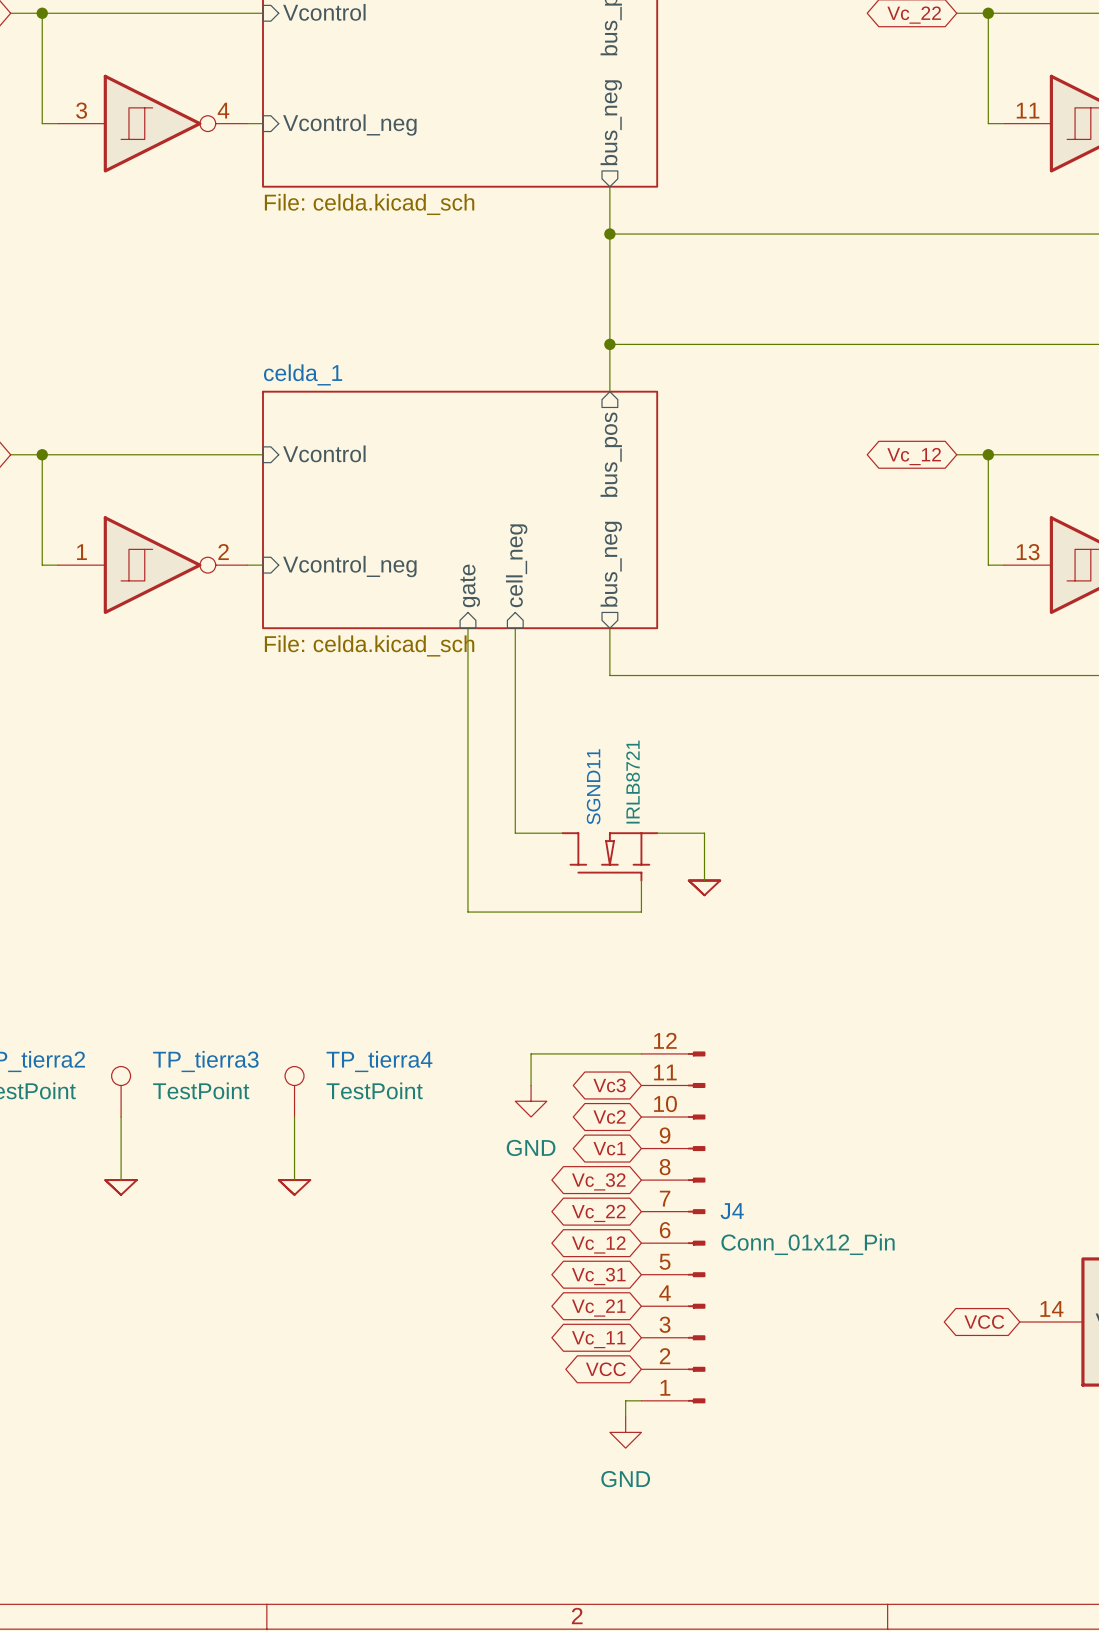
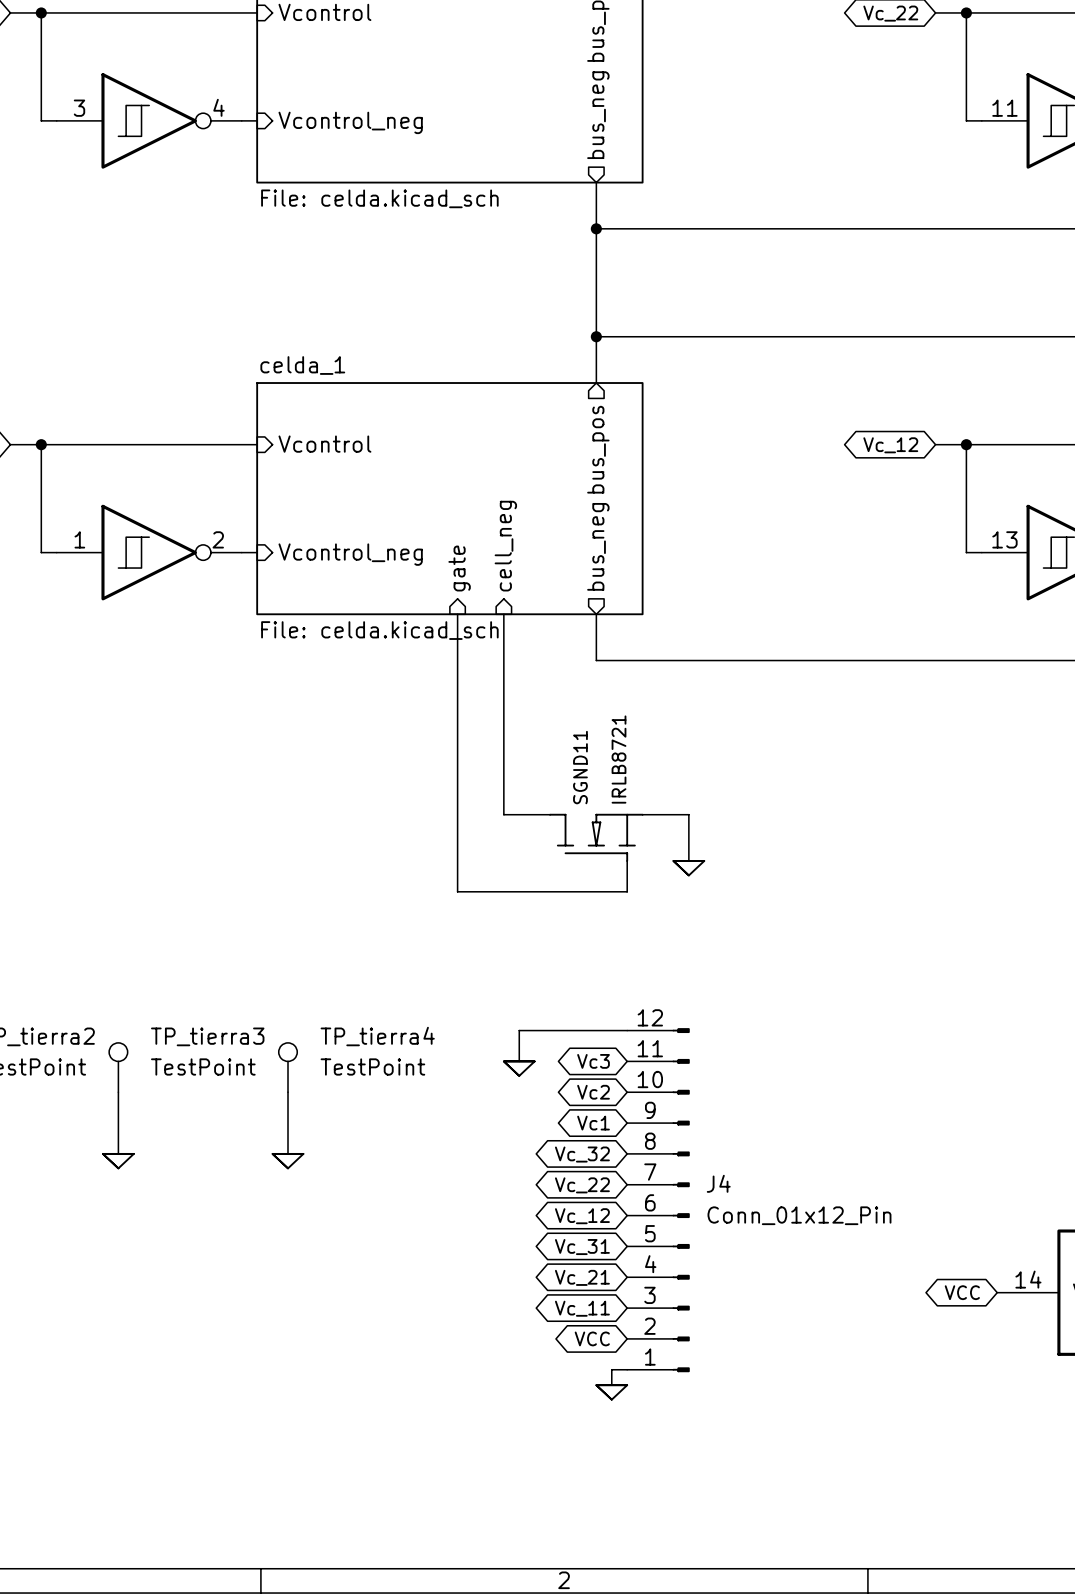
power symbol shape: [515, 1085, 547, 1118] -> [502, 1060, 536, 1077]
power symbol text: GND (531, 1147) -> none
power symbol shape: [609, 1416, 642, 1449] -> [595, 1384, 629, 1401]
power symbol text: GND (625, 1479) -> none

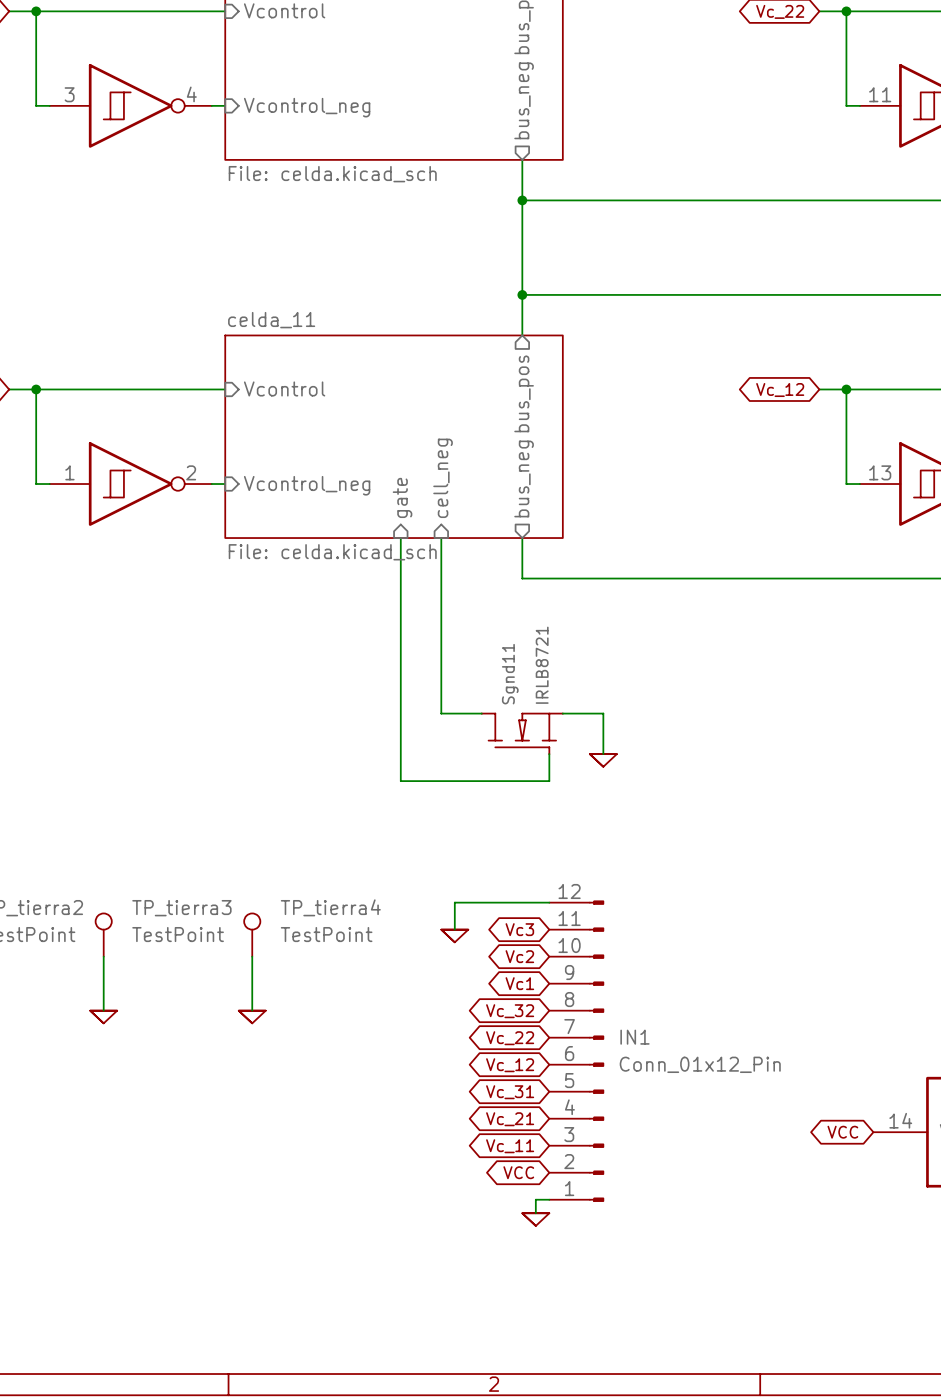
sheet celda_1 name: celda_1 (302, 365) -> celda_11 (271, 320)
SGND11 name: SGND11 (580, 767) -> Sgnd11 (510, 674)
J4 name: J4 (718, 1183) -> IN1 (634, 1037)

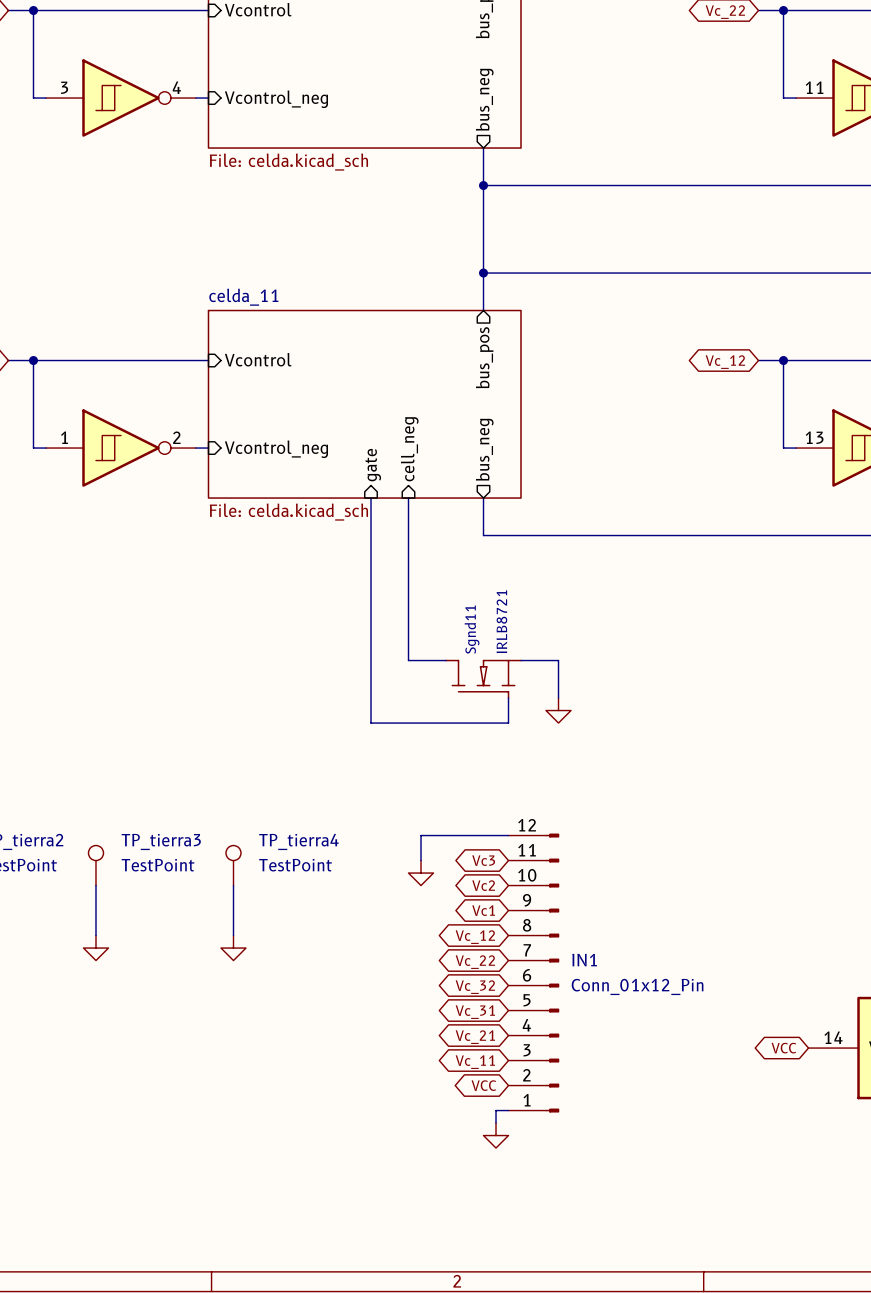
power symbol shape: [589, 753, 618, 768] -> [546, 698, 572, 724]
power symbol shape: [440, 928, 470, 944] -> [408, 860, 434, 886]
power symbol shape: [89, 1009, 119, 1025] -> [83, 935, 109, 961]
power symbol shape: [237, 1009, 267, 1025] -> [220, 935, 247, 961]
global label: Vc_32 (510, 1011) -> Vc_12 (475, 937)
global label: Vc_12 (510, 1065) -> Vc_32 (475, 987)
power symbol shape: [521, 1212, 551, 1227] -> [483, 1123, 509, 1149]

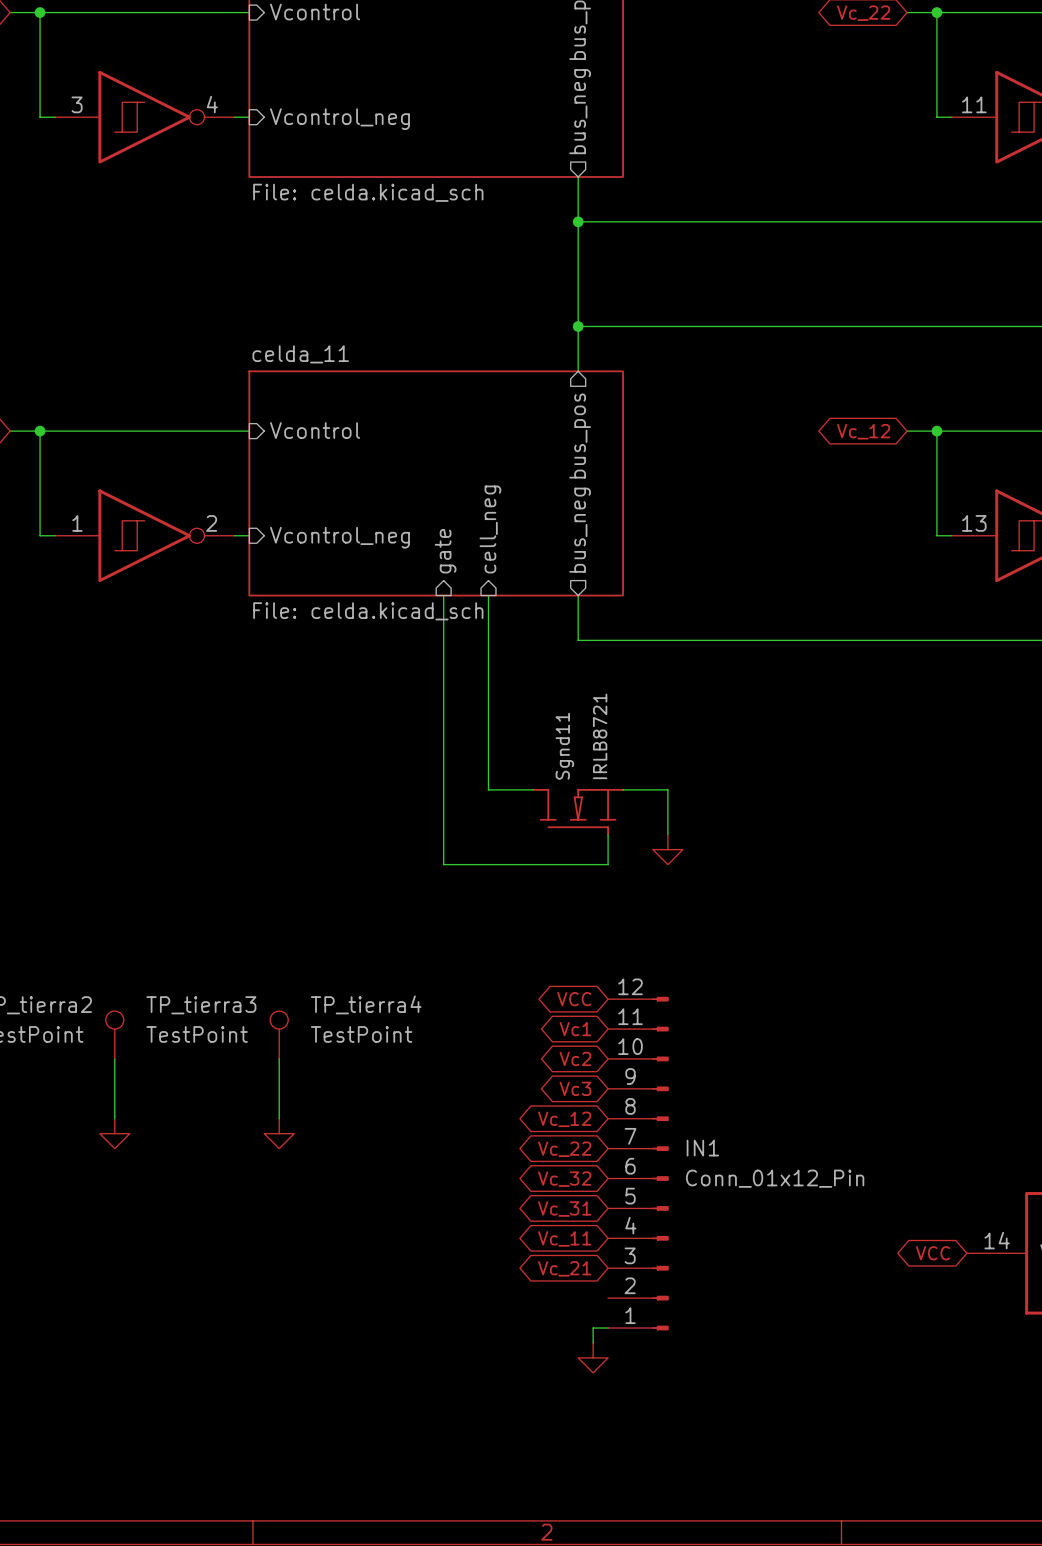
global label: none -> VCC (574, 999)
wire: (508, 835) (421, 835) (421, 860) -> none
global label: Vc3 (483, 860) -> Vc1 (575, 1029)
power symbol: (421, 873) -> none
global label: Vc1 (483, 910) -> Vc3 (575, 1088)
global label: Vc_21 (475, 1037) -> Vc_11 (564, 1238)
global label: Vc_11 (475, 1062) -> Vc_21 (564, 1268)
global label: VCC (483, 1085) -> none

